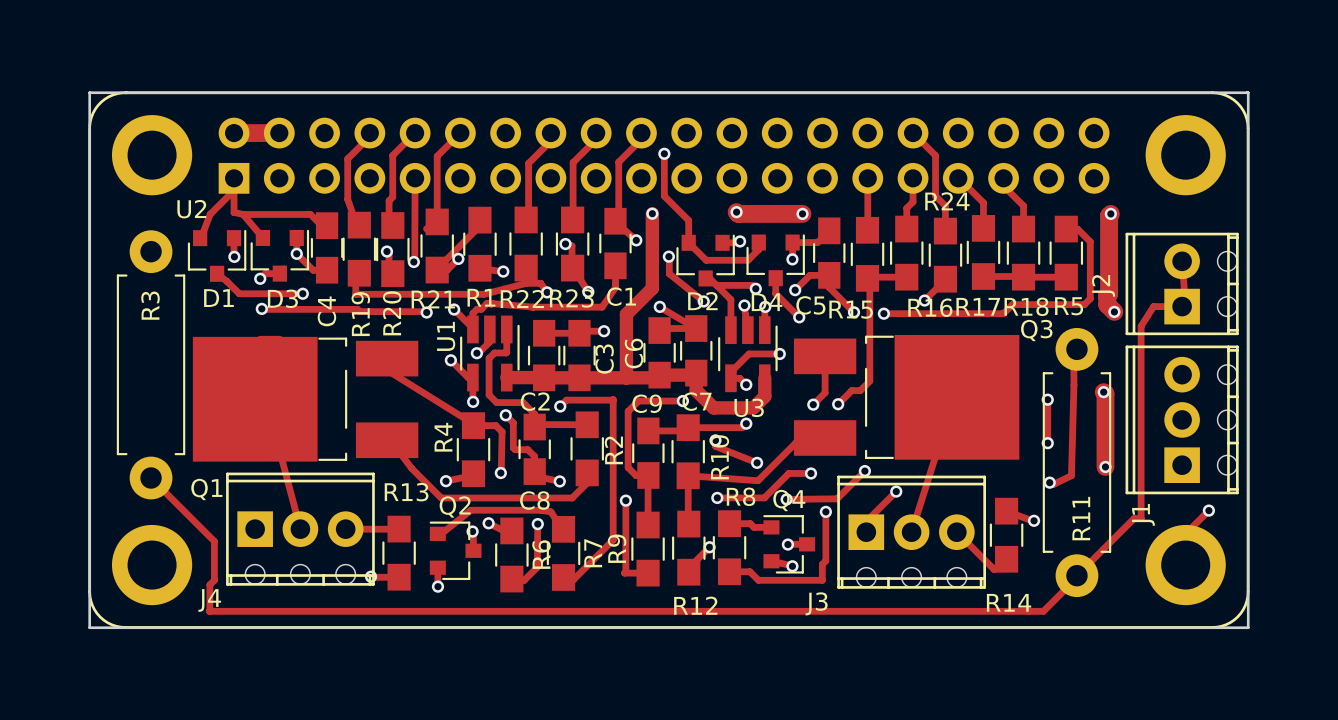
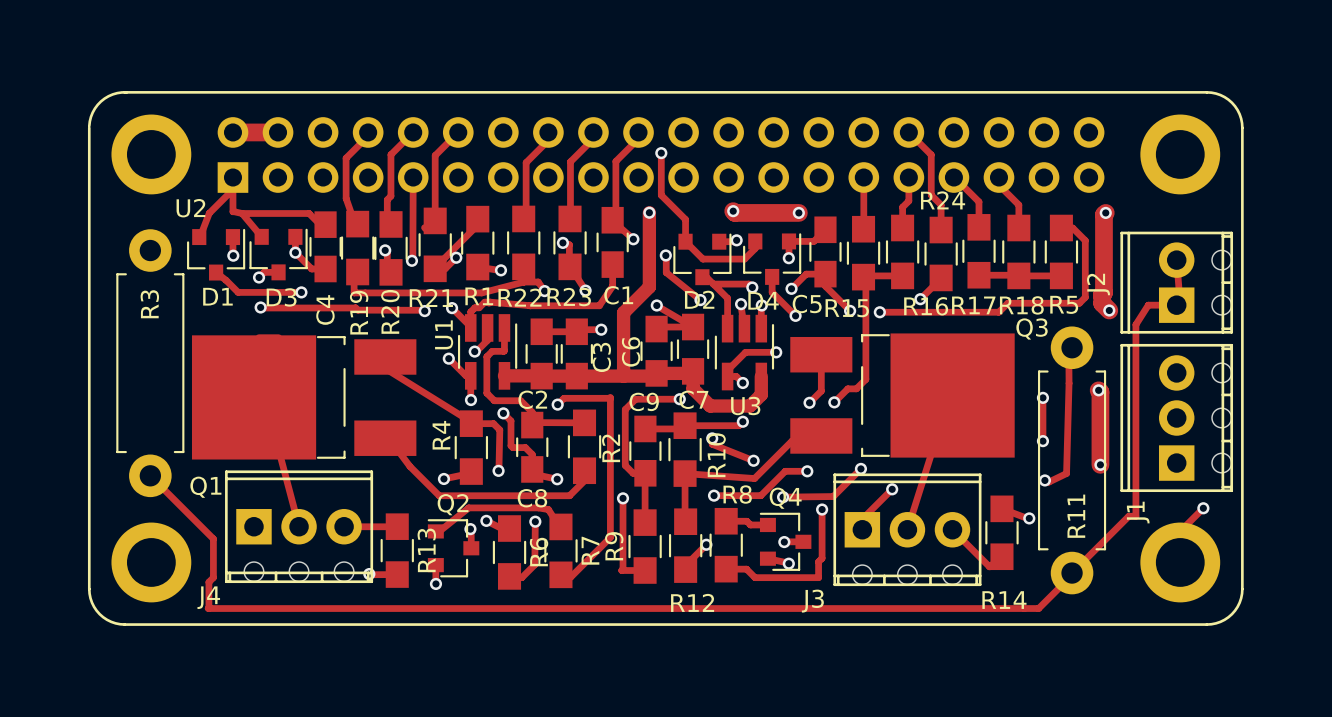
board edge: (89, 92) (89, 627) (1248, 627) (1248, 92) (89, 92) -> none
R13 name rotation: 0° (406, 492) -> 90° counterclockwise (426, 550)
R13 name position: R13 (406, 492) -> R13 (426, 550)

